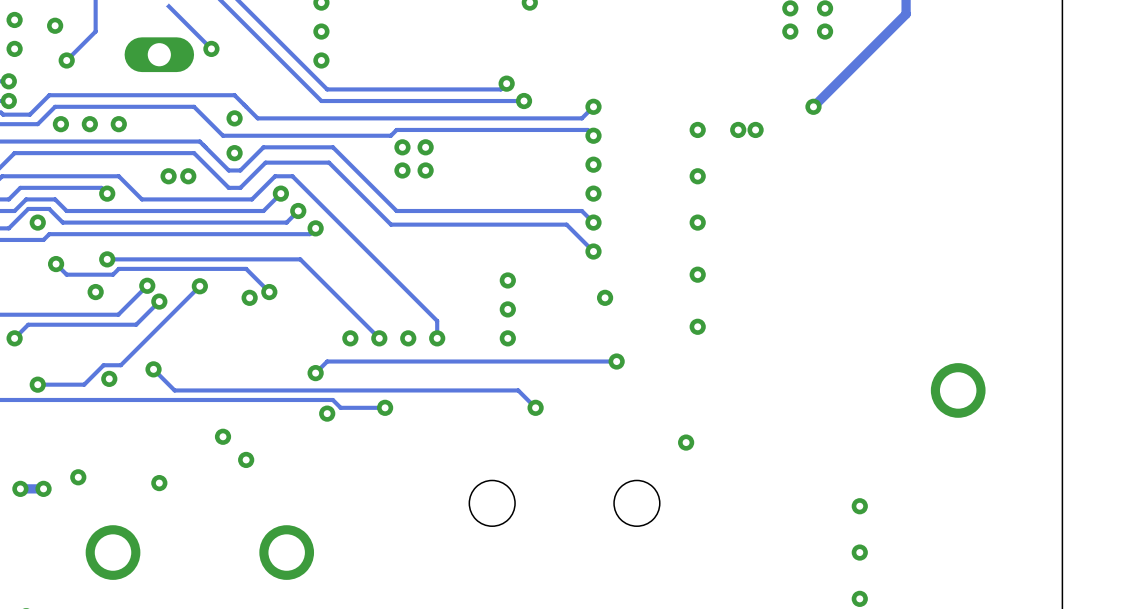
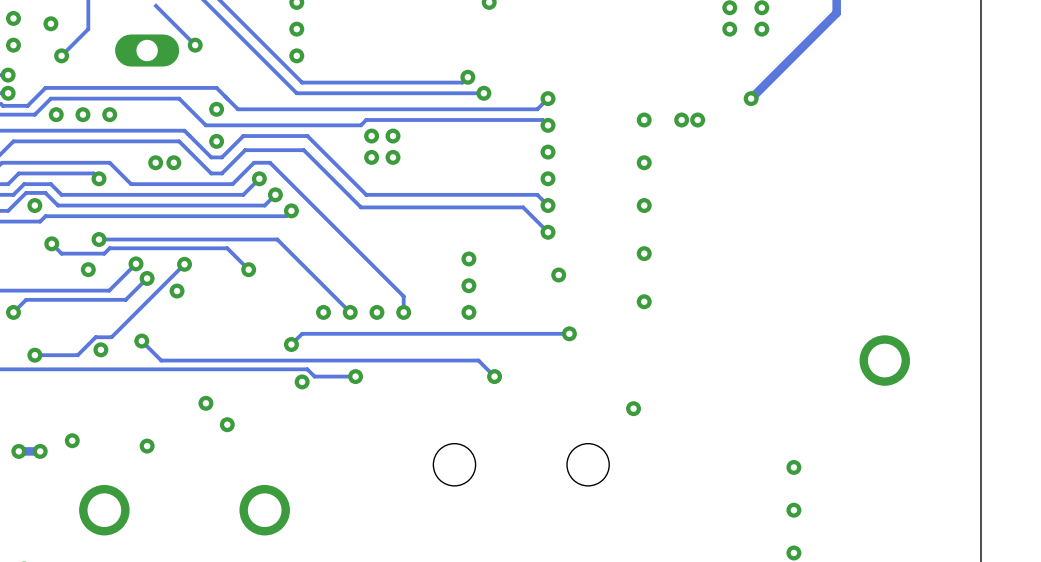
via position: (249, 297) -> (177, 291)

